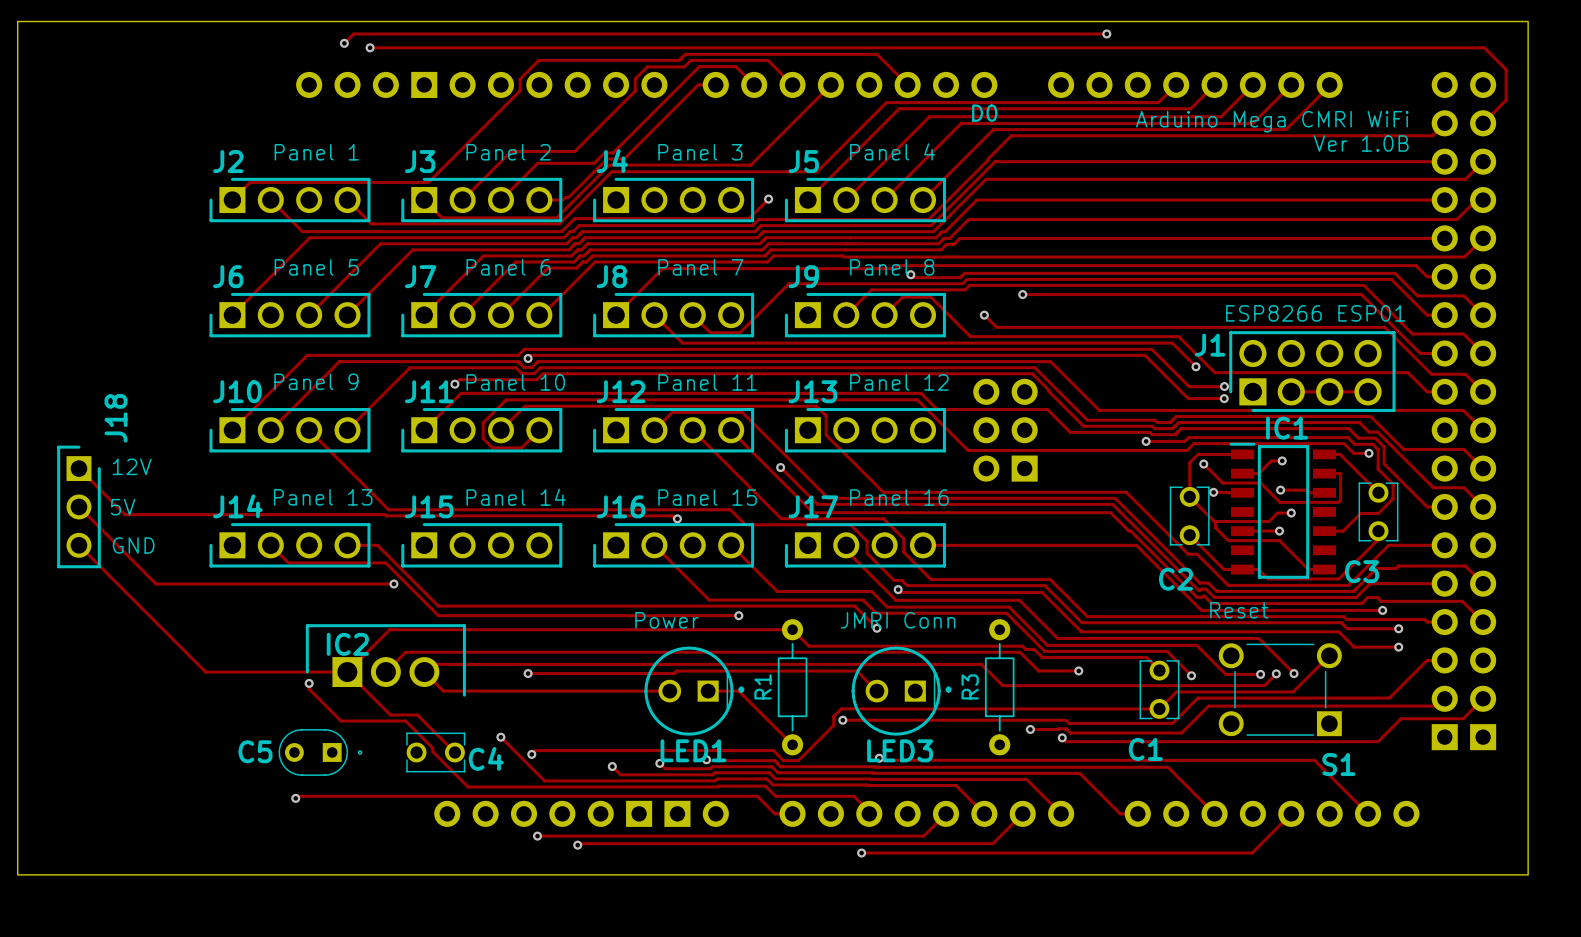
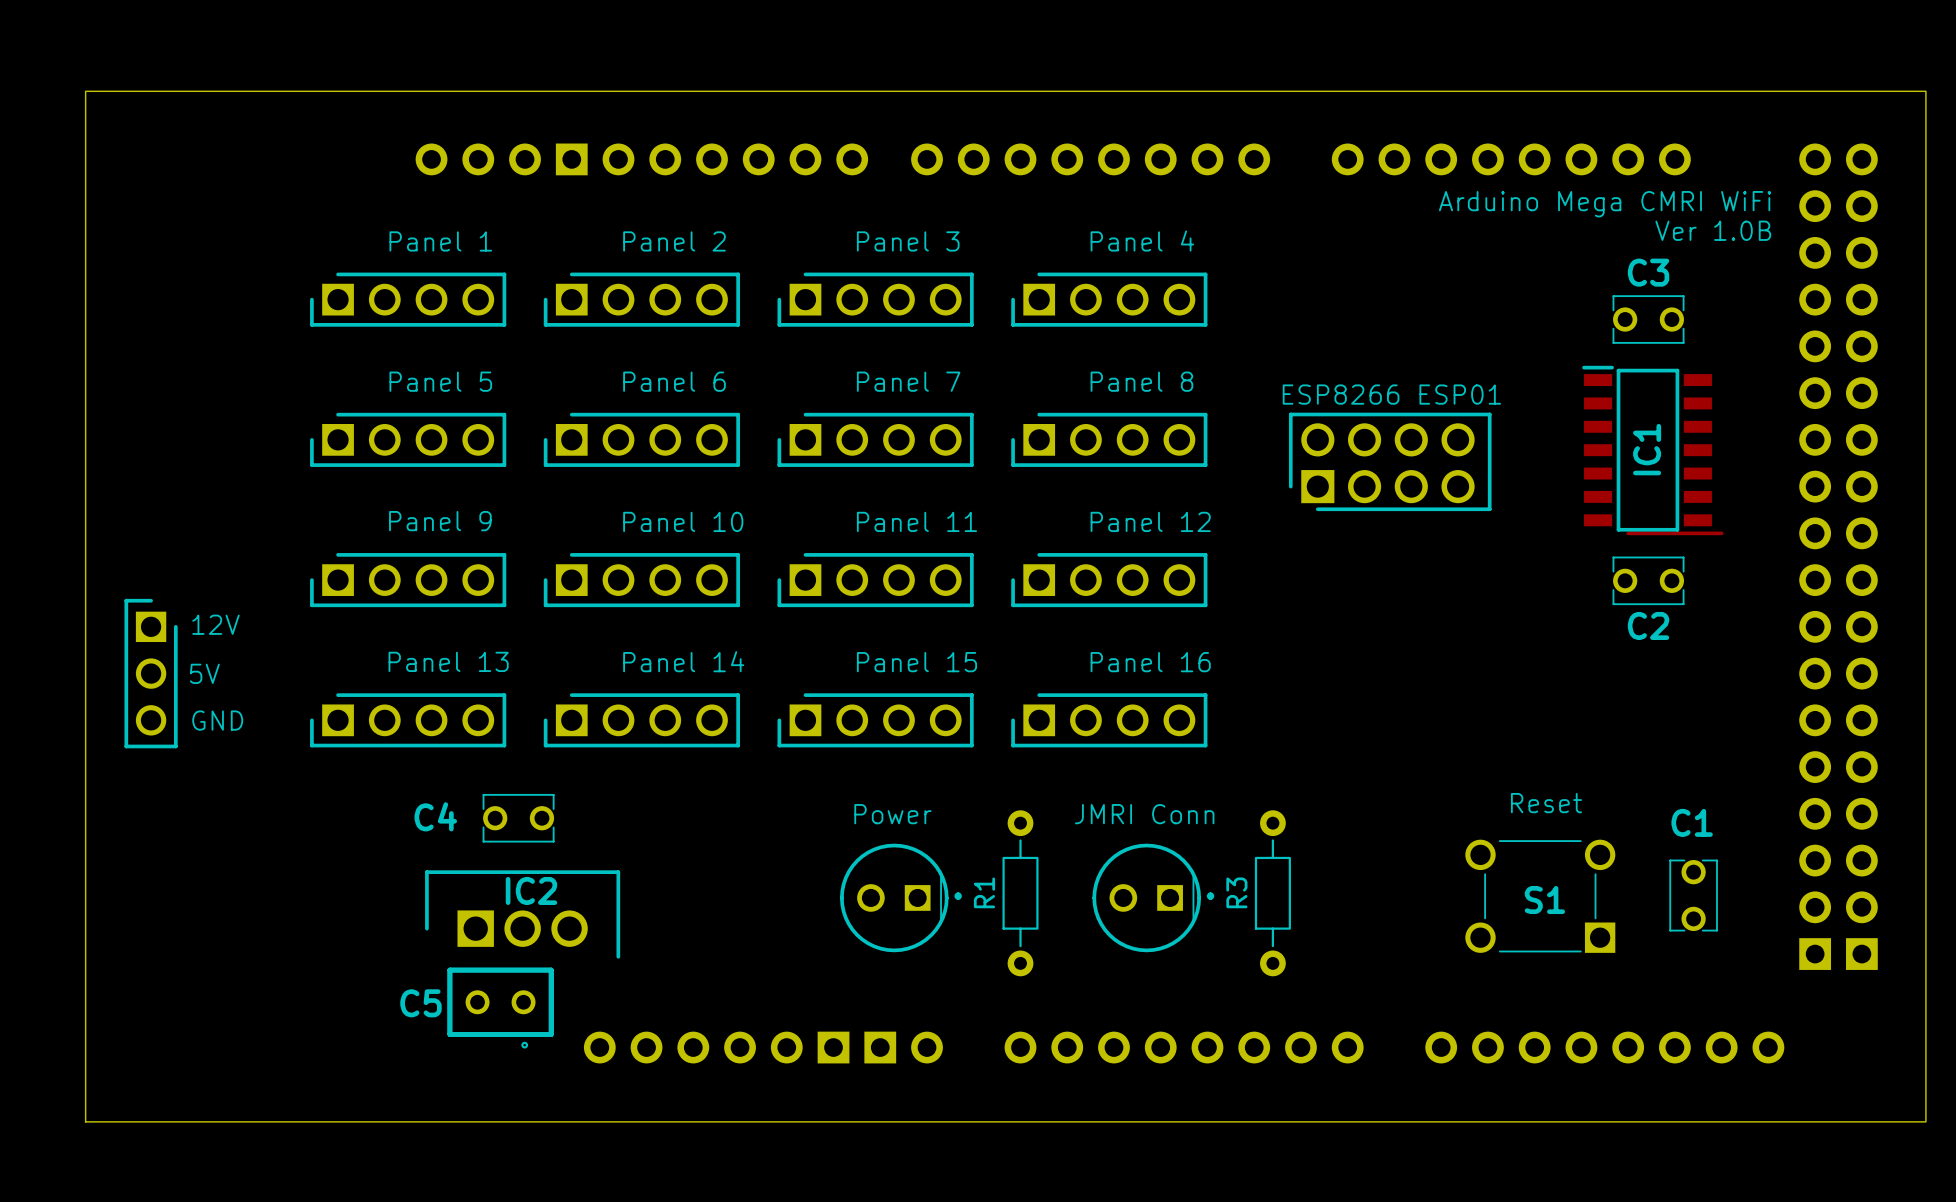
part footprint: [17, 21, 1529, 876] -> [85, 90, 1927, 1123]
track: (1106, 33) (353, 33) (344, 43) -> none
via: (1106, 33) -> none
via: (344, 43) -> none
track: (370, 47) (1484, 47) (1506, 69) (1506, 100) (1483, 123) -> none
via: (370, 47) -> none
track: (715, 84) (698, 84) (624, 159) (606, 159) (568, 197) (562, 200) (539, 200) -> none
track: (754, 84) (735, 66) (699, 66) (613, 152) (604, 152) (594, 163) (537, 163) (500, 200) -> none
track: (792, 84) (768, 60) (690, 60) (684, 66) (647, 66) (635, 78) (635, 91) (574, 151) (511, 151) (462, 200) -> none
track: (830, 84) (750, 165) (609, 165) (556, 217) (442, 217) (424, 200) -> none
track: (907, 84) (877, 54) (685, 54) (679, 60) (538, 60) (520, 79) (520, 90) (428, 182) (250, 182) (232, 200) -> none
track: (1176, 84) (1158, 102) (886, 102) (817, 171) (611, 171) (559, 223) (371, 223) (347, 200) -> none
track: (1214, 84) (1190, 108) (899, 108) (807, 200) -> none
track: (1252, 84) (1221, 116) (929, 116) (846, 200) -> none
track: (1291, 84) (1252, 123) (961, 123) (884, 200) -> none
track: (1329, 84) (1286, 129) (993, 129) (922, 200) -> none
track: (1444, 123) (1432, 135) (1011, 135) (928, 219) (758, 219) (752, 225) (579, 225) (564, 237) (309, 237) (232, 315) -> none
J2 name: J2 (228, 161) -> none
J3 name: J3 (420, 161) -> none
J4 name: J4 (612, 161) -> none
J5 name: J5 (803, 161) -> none
track: (1444, 161) (995, 161) (931, 225) (761, 225) (754, 231) (582, 231) (566, 243) (380, 243) (309, 315) -> none
track: (1483, 161) (1465, 179) (986, 179) (933, 231) (763, 231) (757, 237) (585, 237) (569, 249) (412, 249) (347, 315) -> none
track: (768, 199) (749, 218) (574, 218) (561, 231) (302, 231) (270, 200) -> none
via: (768, 199) -> none
track: (1444, 200) (976, 200) (945, 231) (942, 231) (936, 237) (766, 237) (759, 243) (587, 243) (571, 255) (483, 255) (424, 315) -> none
track: (1483, 200) (1476, 200) (1457, 219) (968, 219) (949, 238) (944, 238) (938, 243) (768, 243) (762, 249) (590, 249) (574, 262) (515, 262) (462, 315) -> none
track: (1444, 238) (960, 238) (954, 244) (946, 244) (941, 249) (771, 249) (764, 255) (592, 255) (576, 268) (548, 268) (500, 315) -> none
track: (1483, 238) (1464, 257) (773, 255) (767, 262) (595, 262) (541, 315) (539, 315) -> none
track: (910, 274) (910, 277) (960, 277) (964, 273) (1395, 273) (1417, 295) (1463, 295) (1483, 315) -> none
via: (910, 274) -> none
J6 name: J6 (228, 276) -> none
J7 name: J7 (420, 276) -> none
J8 name: J8 (611, 276) -> none
J9 name: J9 (803, 276) -> none
track: (1444, 276) (1427, 276) (1416, 265) (897, 265) (894, 268) (662, 268) (616, 315) -> none
track: (1022, 294) (1361, 294) (1420, 353) (1444, 353) -> none
via: (1022, 294) -> none
text position: ESP8266 ESP01 (1315, 313) -> ESP8266 ESP01 (1391, 394)
track: (654, 315) (682, 343) (1172, 343) (1195, 366) -> none
track: (692, 315) (710, 332) (739, 332) (788, 283) (962, 283) (966, 279) (1391, 279) (1427, 315) (1444, 315) -> none
track: (846, 315) (871, 289) (965, 289) (969, 285) (1363, 285) (1412, 334) (1463, 334) (1483, 353) -> none
track: (884, 315) (902, 297) (930, 297) (970, 336) (1178, 336) (1214, 372) (1407, 372) (1427, 391) (1444, 391) -> none
track: (984, 315) (996, 327) (1384, 327) (1431, 374) (1465, 374) (1483, 391) -> none
via: (984, 315) -> none
part: none -> (1390, 461)
track: (528, 358) (531, 355) (1145, 355) (1188, 398) (1224, 398) -> none
via: (528, 358) -> none
via: (1195, 366) -> none
J1: (1312, 371) -> none
track: (454, 384) (459, 379) (536, 379) (542, 373) (1032, 373) (1083, 426) (1152, 426) (1154, 428) (1172, 428) (1178, 422) (1359, 422) (1369, 432) (1377, 432) (1433, 487) (1463, 487) (1483, 506) -> none
via: (454, 384) -> none
track: (1224, 386) (1189, 386) (1151, 349) (524, 349) (518, 355) (307, 355) (232, 430) -> none
via: (1224, 386) -> none
J10 name: J10 (237, 391) -> none
J11 name: J11 (429, 391) -> none
J12 name: J12 (621, 391) -> none
J13 name: J13 (812, 391) -> none
via: (1224, 398) -> none
J18 name: J18 (116, 418) -> none
IC1 name rotation: 0° (1287, 428) -> 90° counterclockwise (1647, 449)
IC1 name position: IC1 (1287, 428) -> IC1 (1647, 449)
track: (270, 430) (339, 361) (518, 361) (524, 367) (531, 367) (537, 361) (1050, 361) (1099, 410) (1463, 410) (1483, 430) -> none
track: (309, 430) (388, 509) (730, 509) (745, 524) (850, 524) (867, 541) (867, 553) (894, 580) (901, 580) (907, 585) (1044, 585) (1081, 622) (1341, 622) (1347, 628) (1398, 628) -> none
track: (347, 430) (409, 367) (515, 367) (521, 373) (534, 373) (540, 367) (1034, 367) (1087, 420) (1154, 420) (1157, 422) (1170, 422) (1176, 416) (1370, 416) (1403, 449) (1463, 449) (1483, 468) -> none
track: (424, 430) (461, 393) (921, 393) (937, 409) (1047, 409) (1070, 432) (1149, 432) (1152, 434) (1175, 434) (1181, 428) (1348, 428) (1358, 438) (1375, 438) (1384, 447) -> none
track: (500, 430) (525, 406) (816, 406) (826, 416) (826, 435) (883, 492) (1126, 492) (1188, 554) (1197, 554) (1228, 585) (1348, 585) (1388, 545) (1444, 545) -> none
track: (539, 430) (521, 447) (492, 447) (483, 438) (483, 422) (506, 399) (917, 399) (968, 450) (1187, 450) (1193, 443) (1344, 443) (1353, 453) (1368, 453) -> none
track: (654, 430) (672, 412) (742, 412) (828, 498) (1115, 498) (1199, 583) (1208, 583) (1216, 591) (1353, 591) (1376, 568) (1396, 568) (1398, 566) (1465, 566) (1483, 583) -> none
track: (692, 430) (781, 518) (883, 518) (903, 538) (903, 552) (931, 579) (1050, 579) (1087, 616) (1343, 616) (1346, 619) (1424, 619) (1427, 622) (1444, 622) -> none
track: (731, 430) (812, 512) (1110, 512) (1196, 597) (1204, 596) (1211, 603) (1361, 603) (1367, 597) (1377, 597) (1381, 601) (1462, 601) (1483, 622) -> none
track: (1146, 441) (1184, 441) (1188, 437) (1347, 437) (1354, 444) (1372, 444) (1378, 449) (1378, 469) (1393, 484) (1393, 498) (1378, 513) (1360, 513) (1343, 531) (1324, 531) -> none
via: (1146, 441) -> none
track: (1384, 447) (1384, 463) (1427, 506) (1444, 506) -> none
via: (1368, 453) -> none
track: (1242, 454) (1198, 454) (1189, 462) (1189, 496) (1215, 522) -> none
track: (1324, 454) (1340, 454) (1378, 492) -> none
track: (1282, 460) (1271, 460) (1258, 473) (1242, 473) -> none
via: (1282, 460) -> none
track: (1203, 464) (1222, 483) (1260, 483) (1279, 502) (1338, 502) (1340, 500) (1340, 473) (1324, 473) -> none
via: (1203, 464) -> none
track: (780, 467) (817, 504) (1112, 504) (1198, 590) (1205, 589) (1214, 597) (1356, 597) (1370, 583) (1444, 583) -> none
via: (780, 467) -> none
track: (78, 468) (125, 514) (671, 515) (677, 518) -> none
track: (1280, 490) (1305, 490) (1308, 492) (1324, 492) -> none
via: (1280, 490) -> none
track: (1213, 492) (1242, 492) -> none
via: (1213, 492) -> none
track: (78, 506) (156, 584) (393, 584) -> none
J14 name: J14 (237, 506) -> none
J15 name: J15 (429, 506) -> none
J16 name: J16 (621, 506) -> none
J17 name: J17 (813, 506) -> none
IC1 position: (1282, 510) -> (1647, 448)
C3 rotation: 0° (1378, 511) -> 90° clockwise (1648, 319)
C3 position: (1378, 511) -> (1648, 319)
track: (1291, 513) (1277, 513) (1268, 521) (1215, 522) -> none
via: (1291, 513) -> none
C2 rotation: 0° (1189, 516) -> 90° clockwise (1648, 580)
C2 position: (1189, 516) -> (1648, 580)
via: (677, 518) -> none
track: (1215, 522) (1215, 527) (1228, 540) (1279, 540) (1308, 569) (1324, 569) -> none
via: (1279, 531) -> none
track: (1378, 531) (1378, 539) (1338, 578) (1268, 578) (1258, 569) (1223, 569) (1189, 535) -> none
track: (78, 545) (205, 672) (347, 672) -> none
track: (270, 545) (288, 562) (385, 562) (438, 615) (738, 615) -> none
track: (347, 545) (377, 545) (438, 606) (854, 606) (876, 628) -> none
track: (654, 545) (709, 600) (863, 600) (876, 613) (1006, 613) (1044, 651) (1167, 651) (1191, 675) -> none
track: (731, 545) (777, 591) (871, 591) (887, 607) (1009, 607) (1047, 645) (1196, 645) (1225, 674) (1260, 674) -> none
track: (846, 545) (846, 550) (896, 600) (1019, 600) (1057, 638) (1258, 638) (1294, 673) -> none
track: (922, 545) (1136, 545) (1201, 610) (1382, 610) -> none
C3 name position: C3 (1361, 571) -> C3 (1648, 272)
C2 name position: C2 (1175, 579) -> C2 (1648, 625)
via: (393, 584) -> none
track: (898, 589) (901, 592) (1042, 592) (1081, 631) (1338, 631) (1354, 647) (1398, 647) -> none
via: (898, 589) -> none
text position: Reset (1239, 610) -> Reset (1546, 803)
via: (1382, 610) -> none
via: (738, 615) -> none
text position: Power (666, 620) -> Power (892, 814)
text position: JMRI Conn (898, 620) -> JMRI Conn (1144, 814)
via: (876, 628) -> none
via: (1398, 628) -> none
IC2 name position: IC2 (347, 644) -> IC2 (531, 890)
via: (1398, 647) -> none
track: (1329, 655) (1293, 692) (1176, 692) (1159, 708) (841, 708) (833, 716) (833, 725) (798, 760) (783, 760) (773, 750) (535, 750) (531, 754) -> none
IC2 position: (385, 660) -> (522, 914)
track: (1444, 660) (1427, 660) (1389, 698) (1197, 698) (1172, 723) (1069, 723) (1066, 720) (842, 720) -> none
track: (1078, 670) (1038, 670) (1019, 652) (405, 652) (385, 672) -> none
via: (1078, 670) -> none
track: (1159, 670) (1146, 657) (1042, 657) (1034, 649) (1025, 649) (1022, 646) (809, 646) (792, 629) (389, 629) (347, 672) -> none
track: (347, 672) (390, 714) (417, 714) (454, 752) -> none
track: (528, 673) (856, 671) (876, 691) -> none
via: (528, 673) -> none
track: (1276, 673) (1264, 685) (1002, 685) (981, 664) (432, 664) (424, 672) (443, 691) (669, 691) -> none
via: (1276, 673) -> none
via: (1294, 673) -> none
via: (1260, 674) -> none
via: (1191, 675) -> none
track: (309, 683) (309, 689) (341, 721) (405, 721) (468, 786) (765, 786) (775, 796) (853, 796) (869, 813) -> none
via: (309, 683) -> none
C1 position: (1159, 689) -> (1693, 895)
S1 position: (1280, 689) -> (1540, 896)
track: (708, 691) (738, 691) (792, 744) -> none
track: (1444, 698) (1437, 706) (1208, 706) (1181, 733) (1070, 733) (1066, 728) (1029, 730) -> none
track: (1483, 698) (1463, 718) (1401, 718) (1378, 741) (1066, 741) (1062, 737) -> none
via: (842, 720) -> none
C5 footprint: [278, 729, 363, 776] -> [447, 967, 554, 1049]
via: (1030, 729) -> none
track: (500, 737) (544, 780) (715, 780) (717, 778) (766, 778) (772, 784) (956, 785) (984, 813) -> none
via: (500, 737) -> none
via: (1062, 737) -> none
C1 name position: C1 (1145, 749) -> C1 (1692, 822)
LED1 name: LED1 (693, 750) -> none
LED3 name: LED3 (900, 750) -> none
C4 position: (435, 752) -> (518, 818)
via: (531, 754) -> none
C4 name position: C4 (486, 758) -> C4 (435, 816)
track: (879, 758) (881, 760) (1314, 760) (1368, 813) -> none
via: (879, 758) -> none
track: (706, 759) (774, 760) (780, 766) (1167, 767) (1214, 813) -> none
via: (706, 759) -> none
track: (659, 763) (665, 768) (771, 766) (777, 772) (1079, 773) (1120, 813) (1137, 813) -> none
via: (659, 763) -> none
S1 name position: S1 (1338, 764) -> S1 (1544, 900)
track: (612, 766) (620, 774) (769, 772) (775, 778) (1026, 779) (1061, 813) -> none
via: (612, 766) -> none
track: (295, 798) (297, 796) (757, 796) (774, 813) (792, 813) -> none
via: (295, 798) -> none
track: (946, 813) (923, 836) (537, 836) -> none
track: (1022, 813) (992, 843) (579, 843) (577, 845) -> none
track: (1291, 813) (1252, 853) (861, 853) -> none
via: (537, 836) -> none
via: (577, 845) -> none
via: (861, 853) -> none

